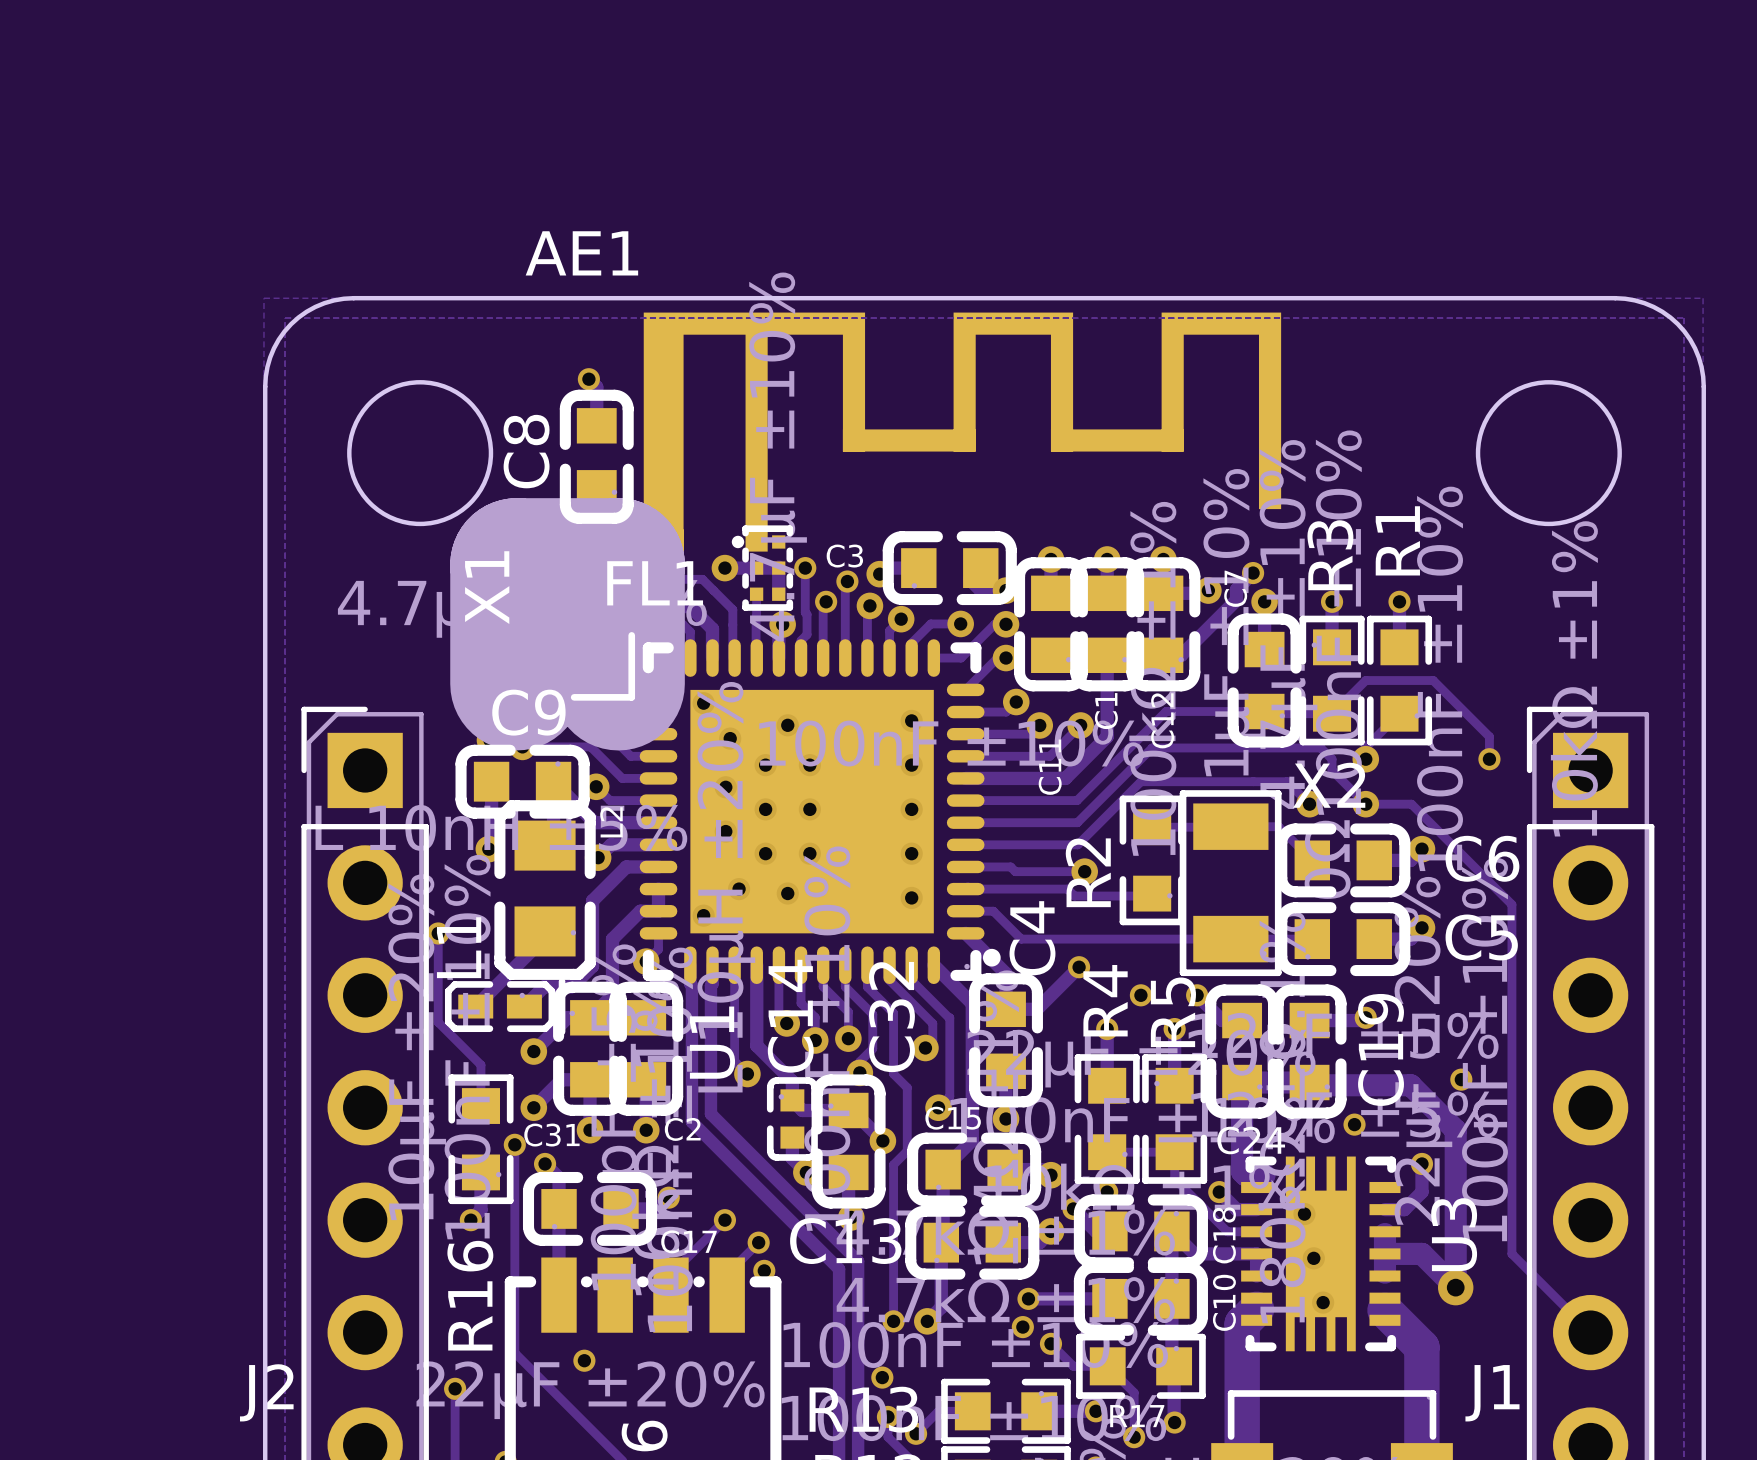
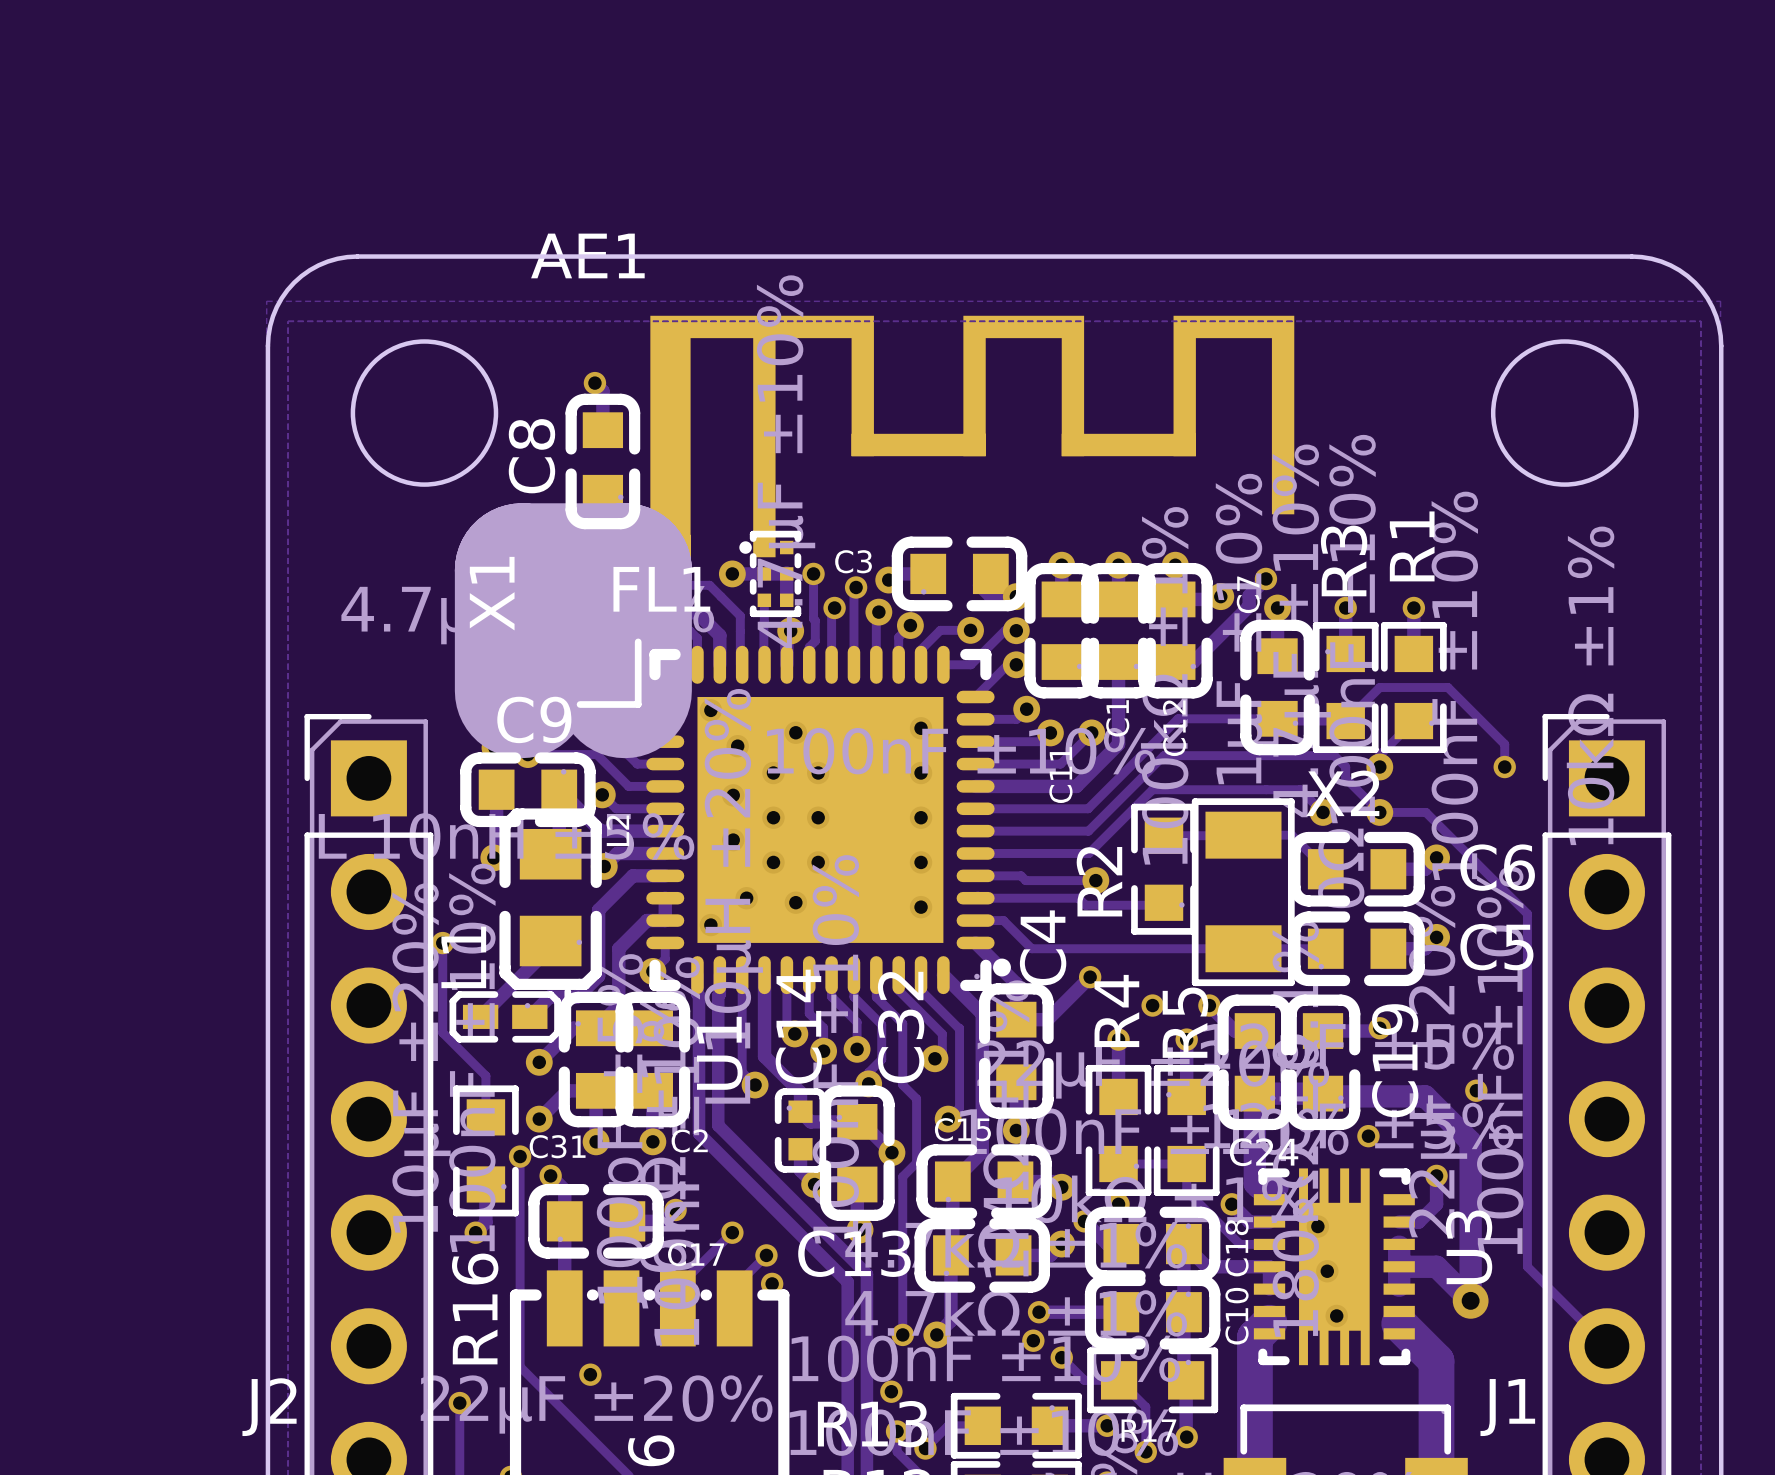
board edge: (265, 386) (270, 357) (278, 339) (291, 324) (306, 311) (324, 303) (353, 298) (1625, 298) (1653, 306) (1677, 324) (1695, 348) (1701, 367) (1703, 386) -> (267, 390) (268, 335) (272, 316) (281, 298) (294, 282) (309, 270) (337, 258) (357, 256) (1641, 257) (1661, 261) (1679, 270) (1695, 282) (1707, 298) (1716, 316) (1720, 335) (1721, 390)
round board edge position: (420, 453) -> (424, 413)
round board edge position: (1548, 453) -> (1564, 413)

